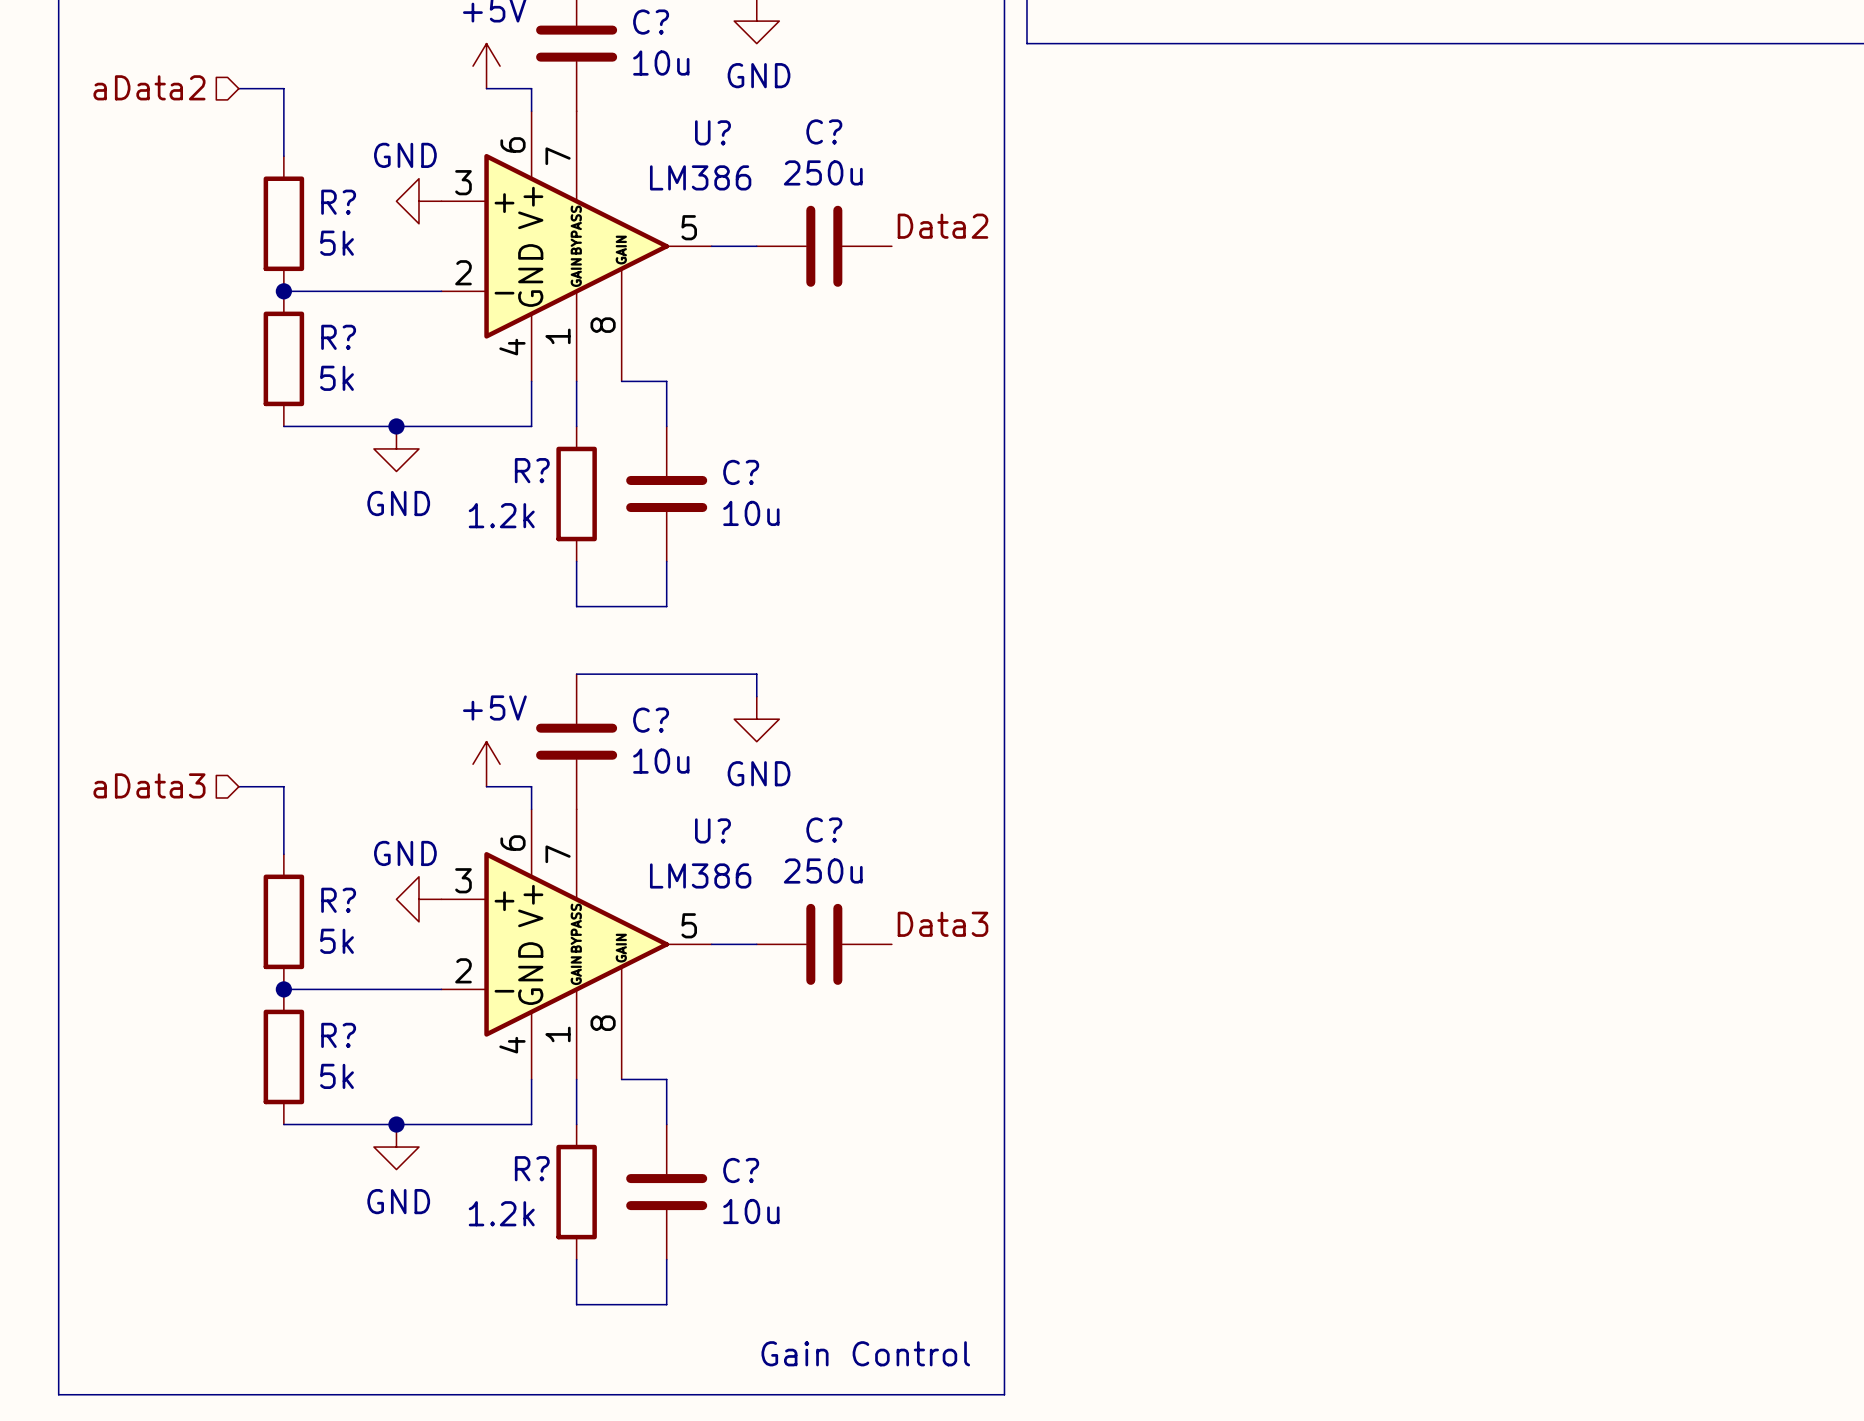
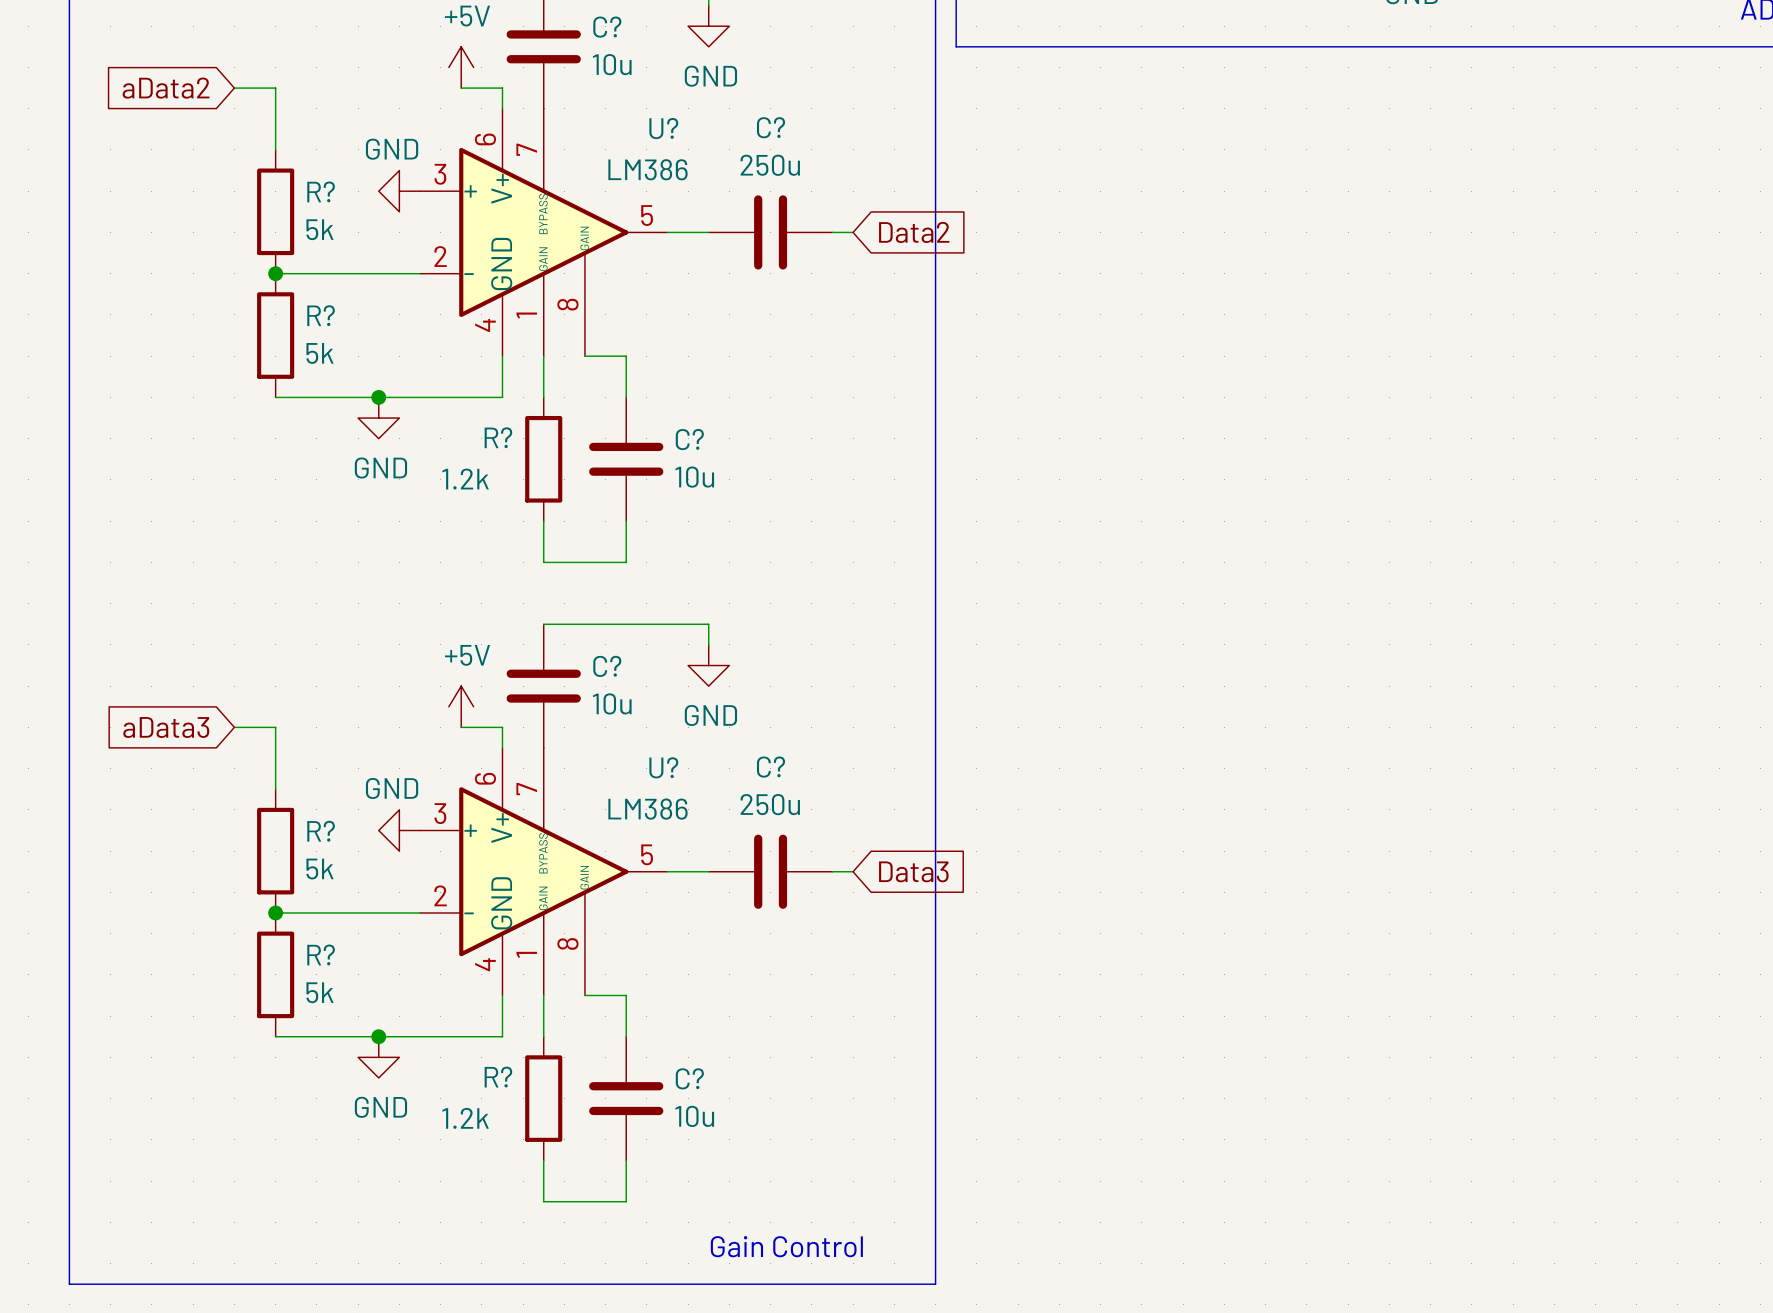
hierarchical label: aData2 (149, 87) -> none
global label: none -> aData2 (166, 88)
label: Data2 (942, 226) -> none
wire: none -> (832, 232) (853, 232)
global label: none -> Data2 (914, 232)
hierarchical label: aData3 (149, 785) -> none
global label: none -> aData3 (166, 727)
label: Data3 (942, 924) -> none
wire: none -> (832, 871) (853, 871)
global label: none -> Data3 (913, 871)

